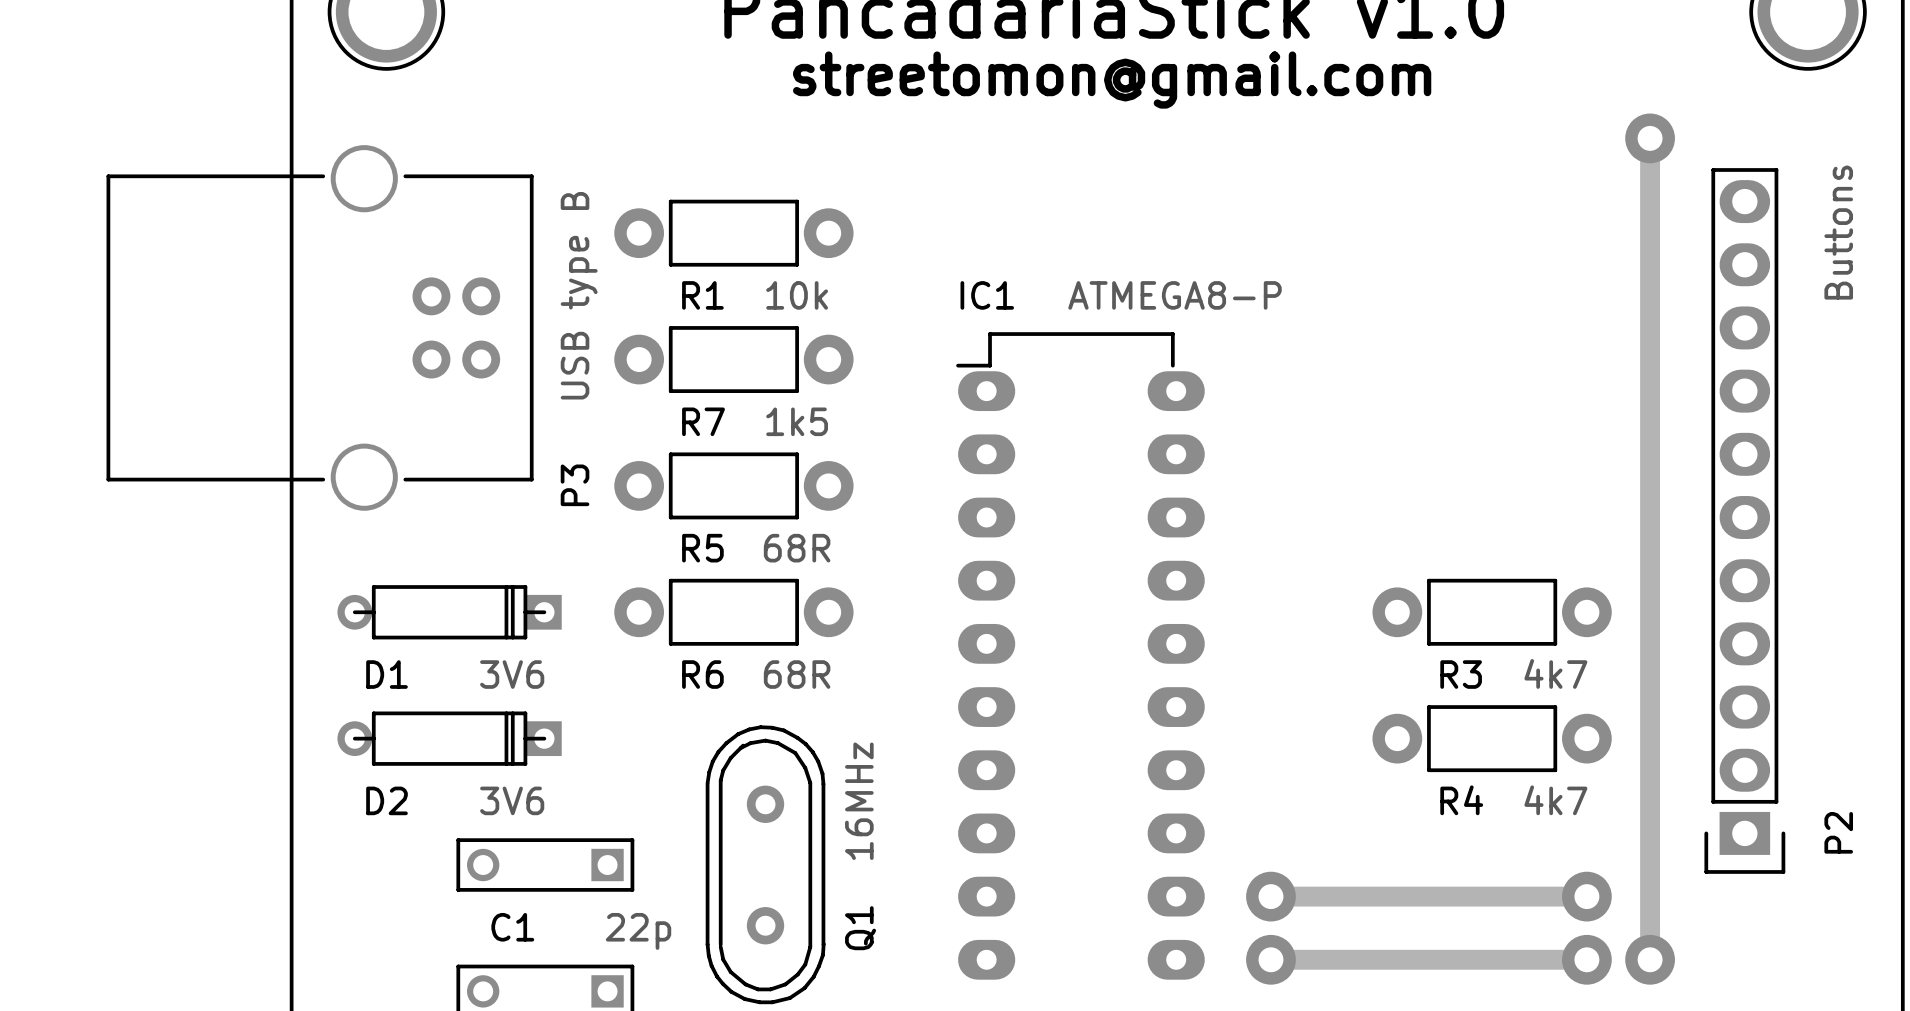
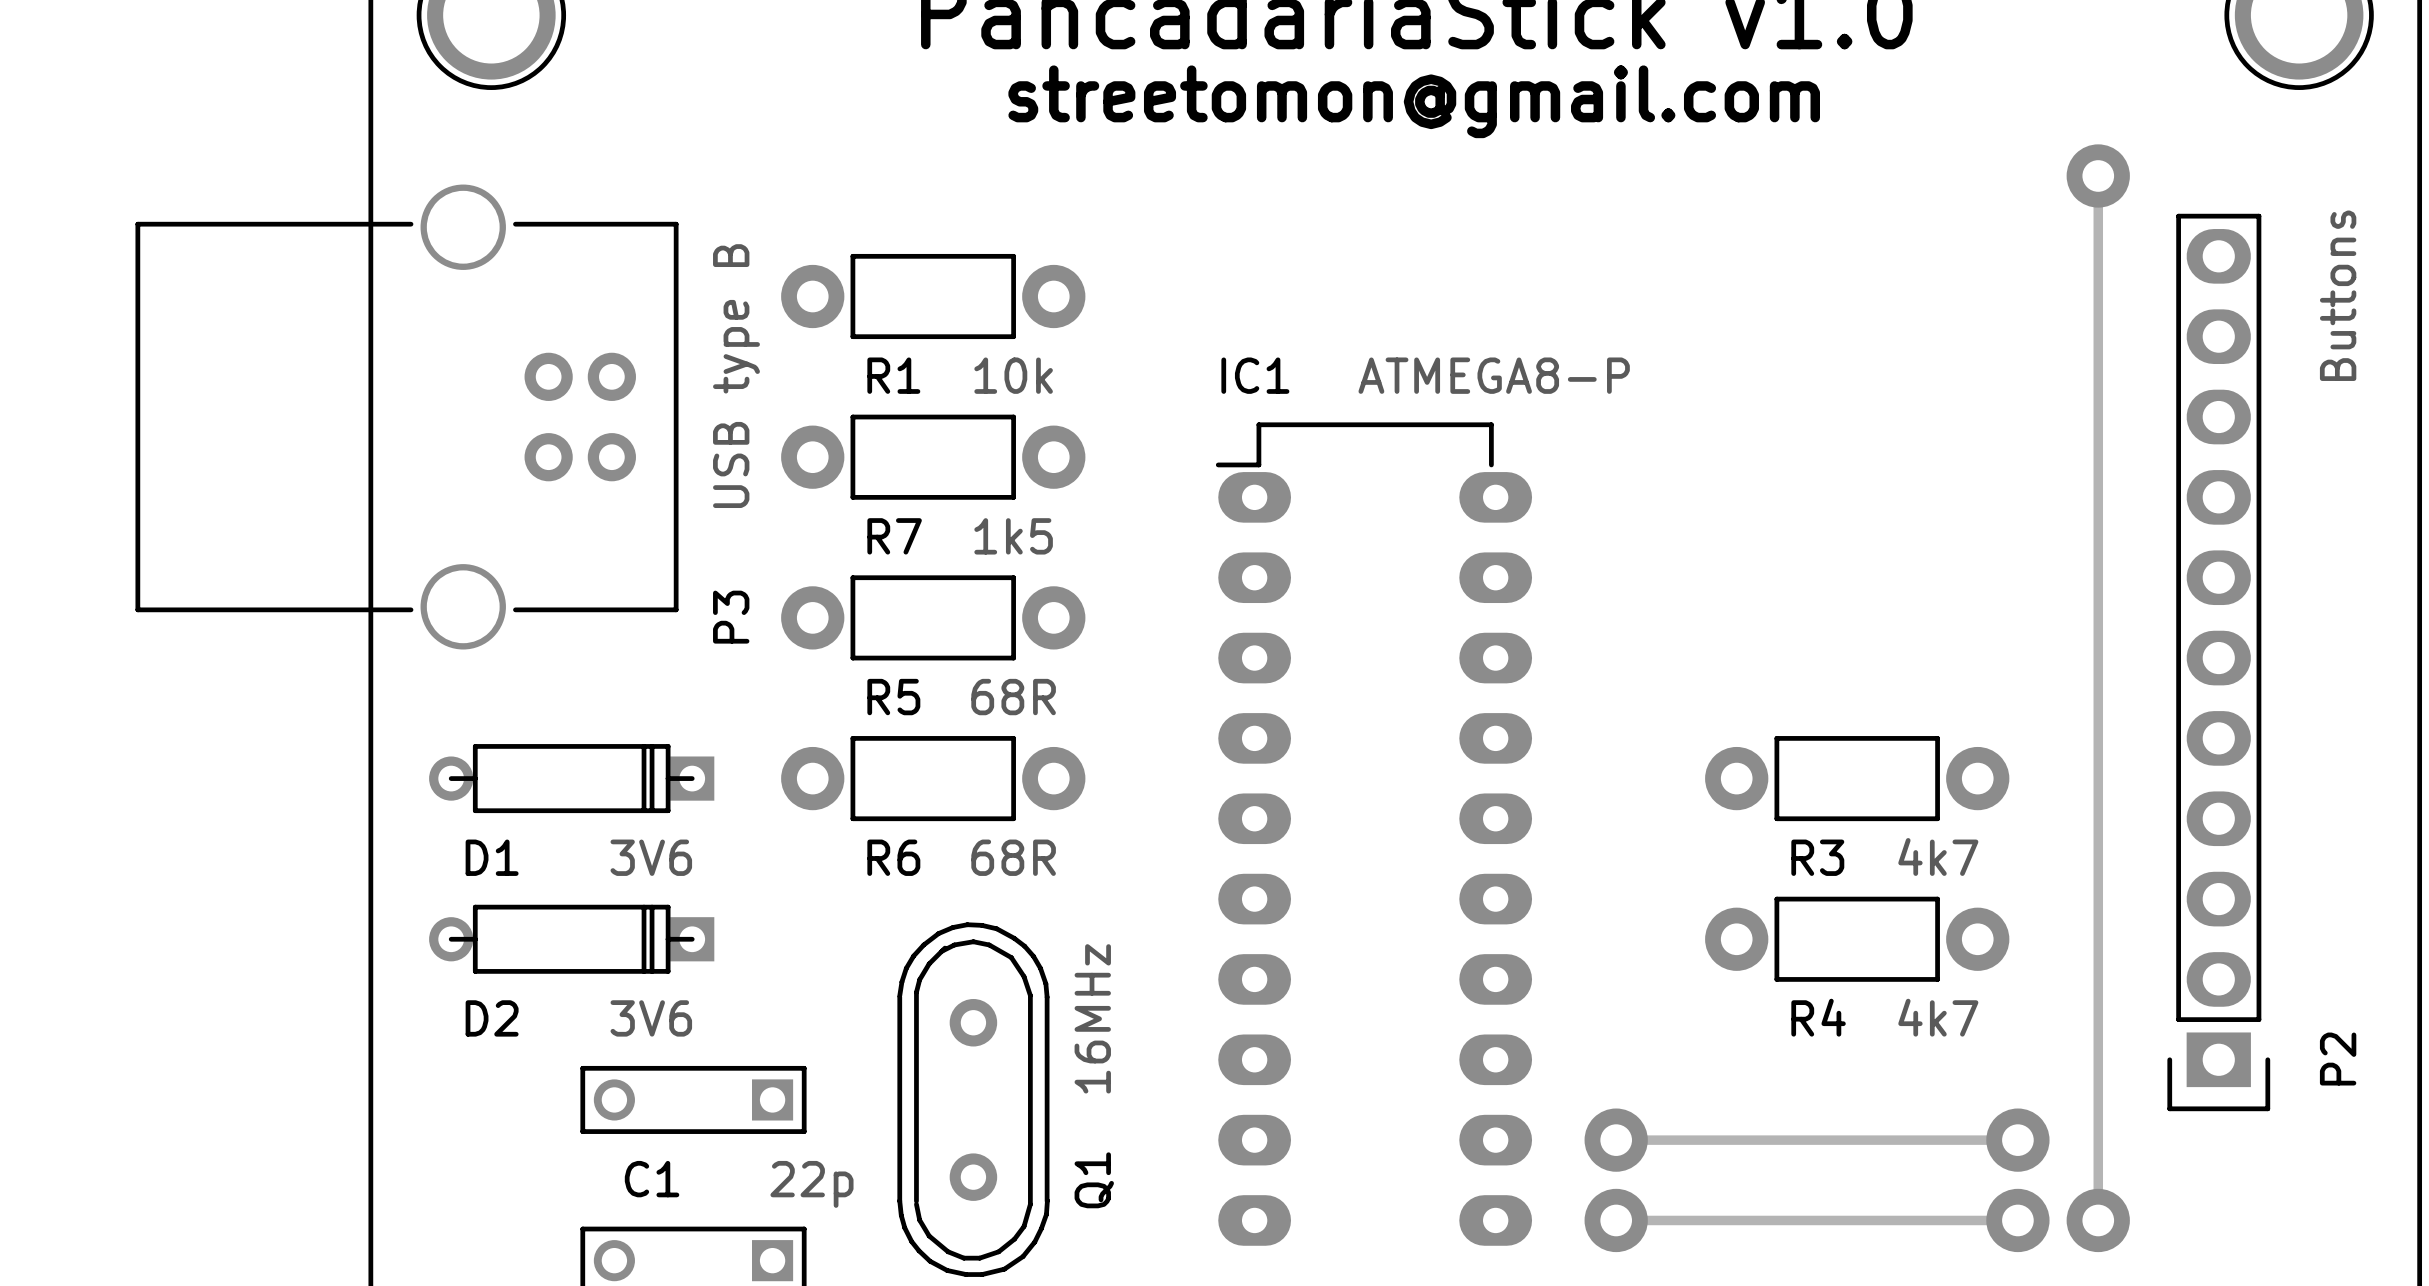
track width: thick (1650, 138) (1650, 959) -> thin (2098, 175) (2098, 1220)
R3 position: (1492, 612) -> (1857, 778)
R4 position: (1492, 738) -> (1857, 939)
track width: thick (1270, 896) (1586, 896) -> thin (1616, 1140) (2017, 1140)
track width: thick (1270, 959) (1586, 959) -> thin (1616, 1220) (2017, 1220)

